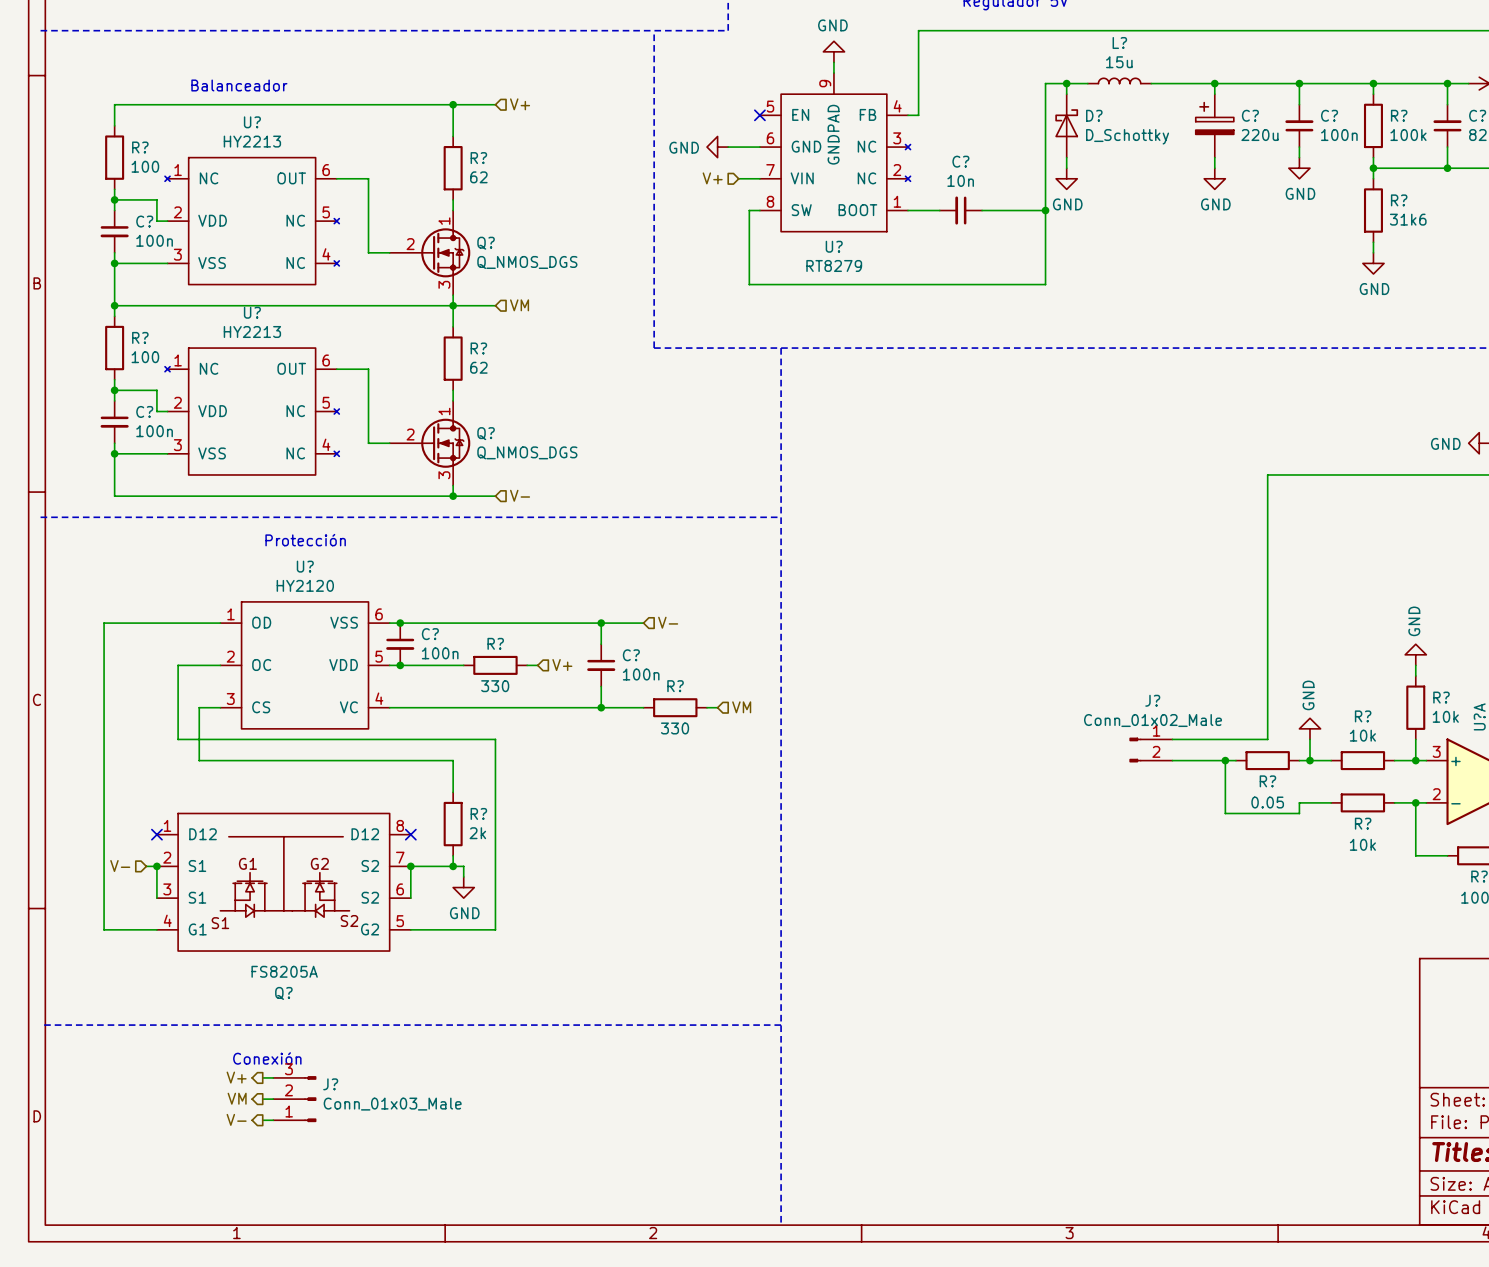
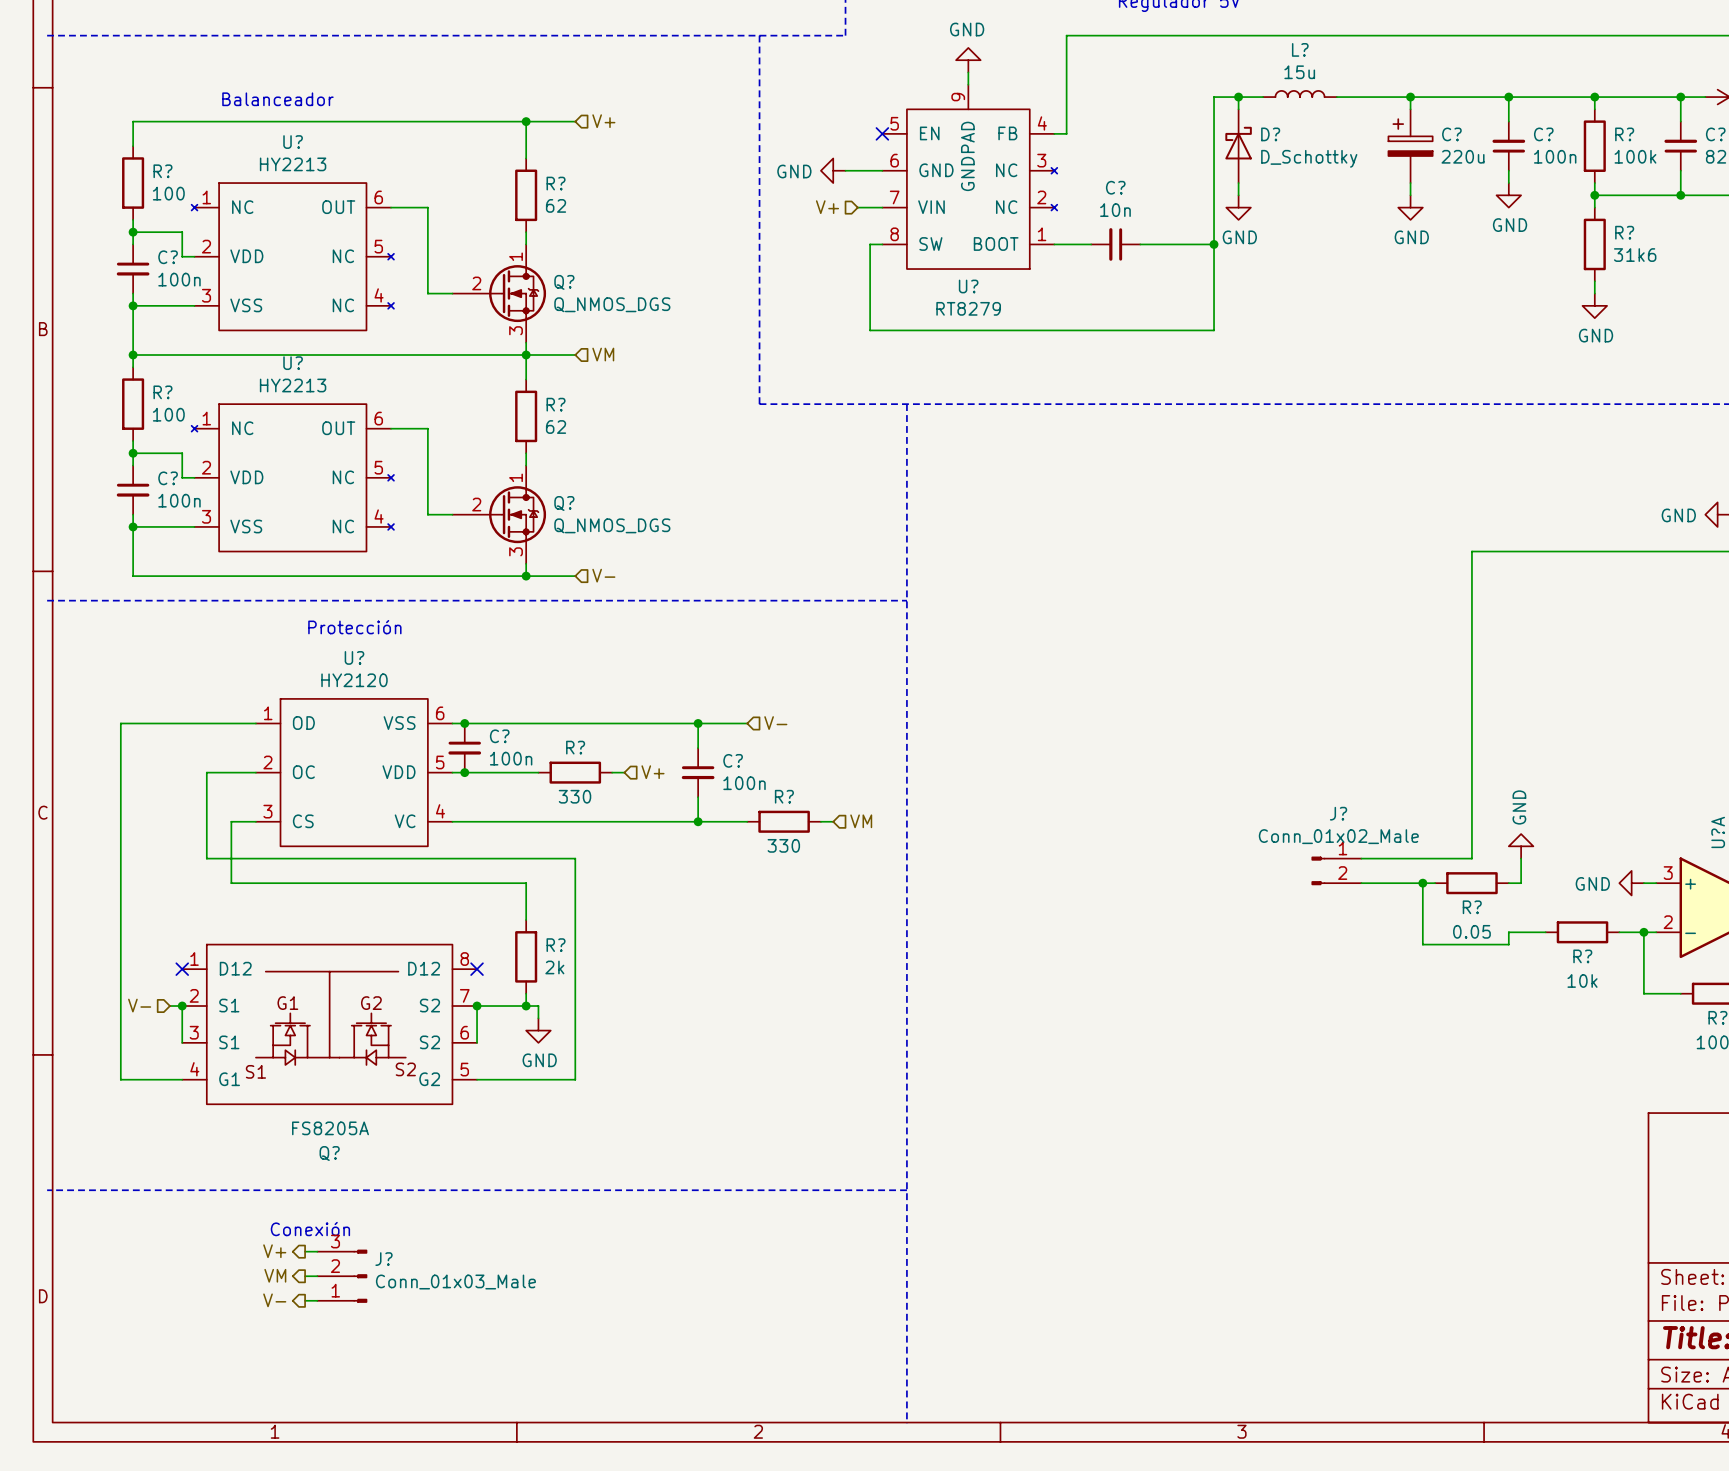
power symbol rotation: 0° (1415, 654) -> 90° counterclockwise (1631, 883)
power symbol position: GND (1415, 654) -> GND (1631, 883)
wire: (1415, 665) (1415, 675) -> none
R?: 10k (1415, 707) -> none
wire: (1415, 739) (1415, 760) (1394, 760) -> none
wire: (1309, 760) (1331, 760) -> none
junction: (1309, 760) -> none
R?: 10k (1362, 760) -> none
junction: (1415, 760) -> none

